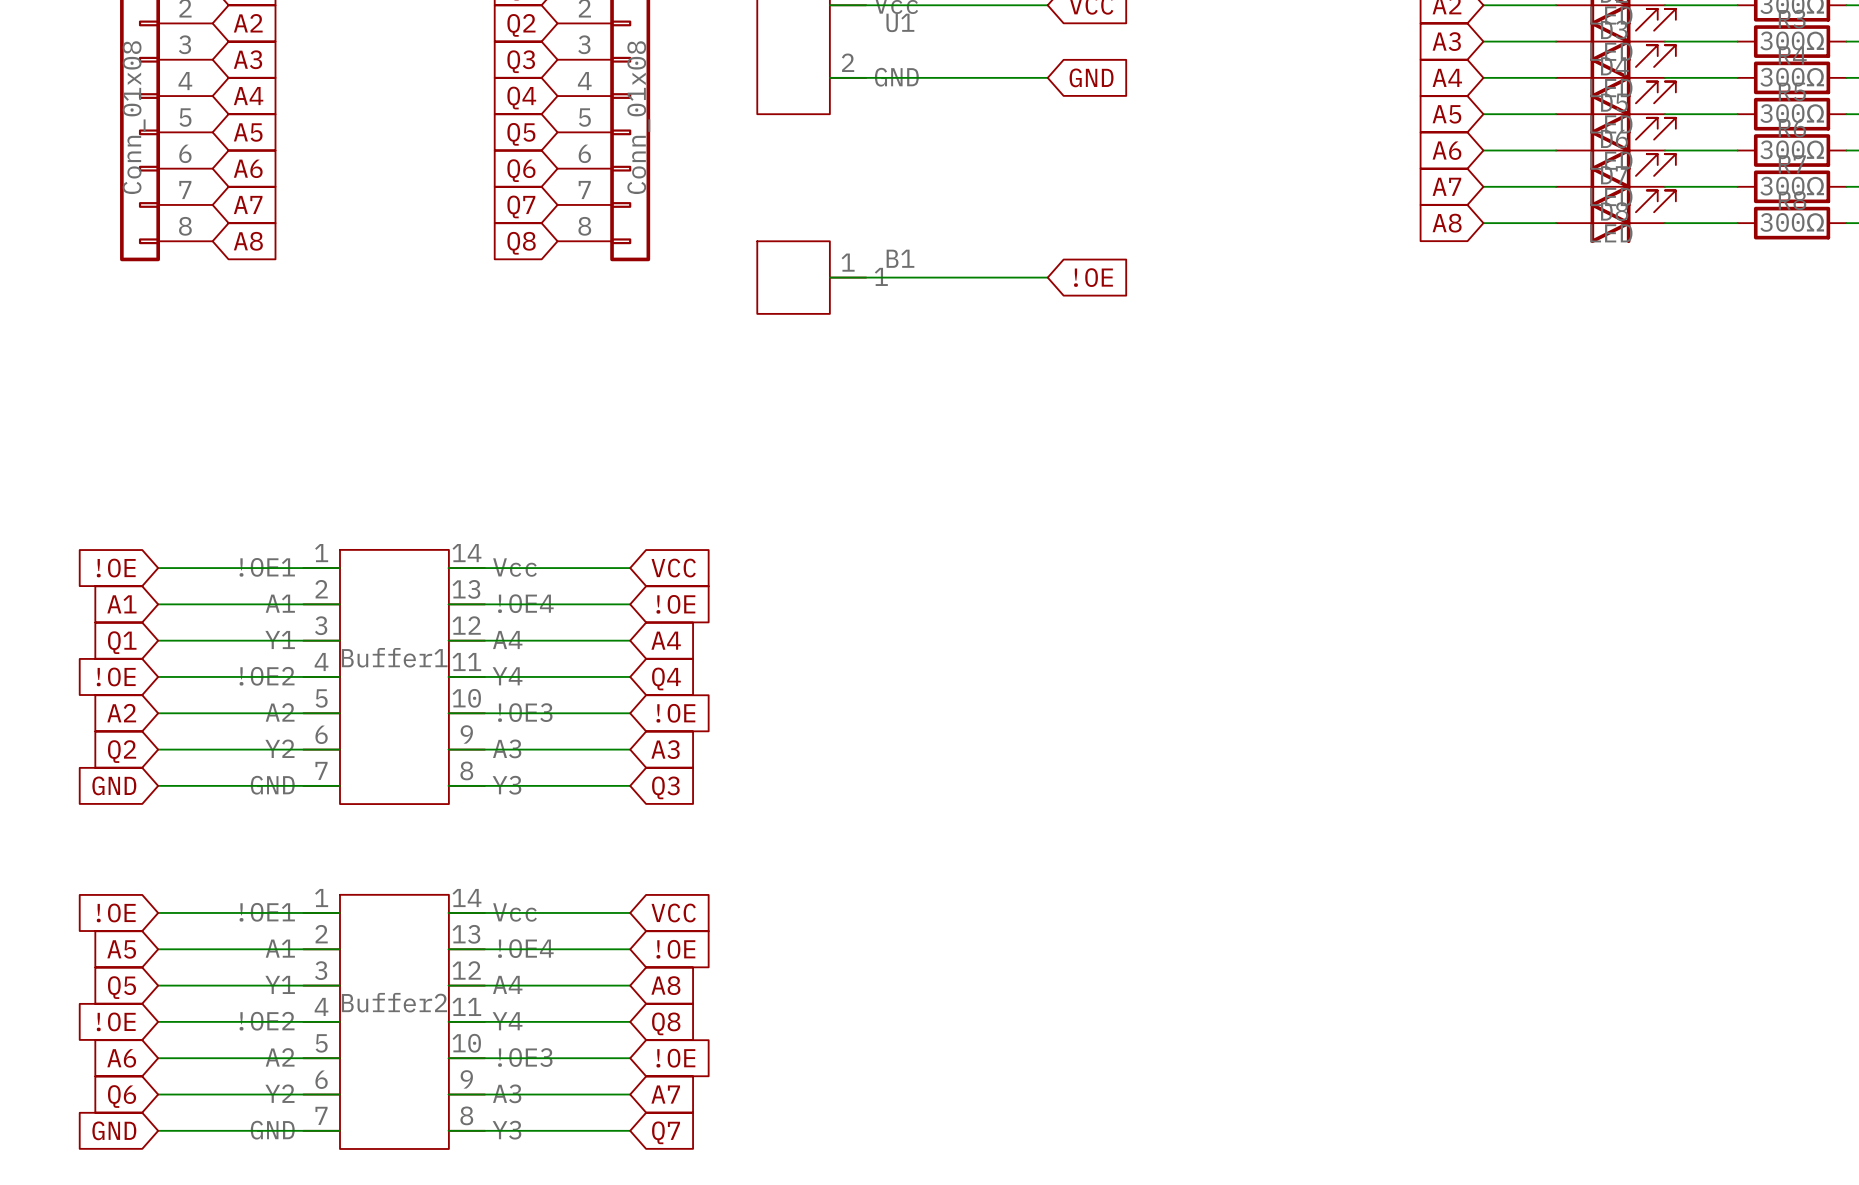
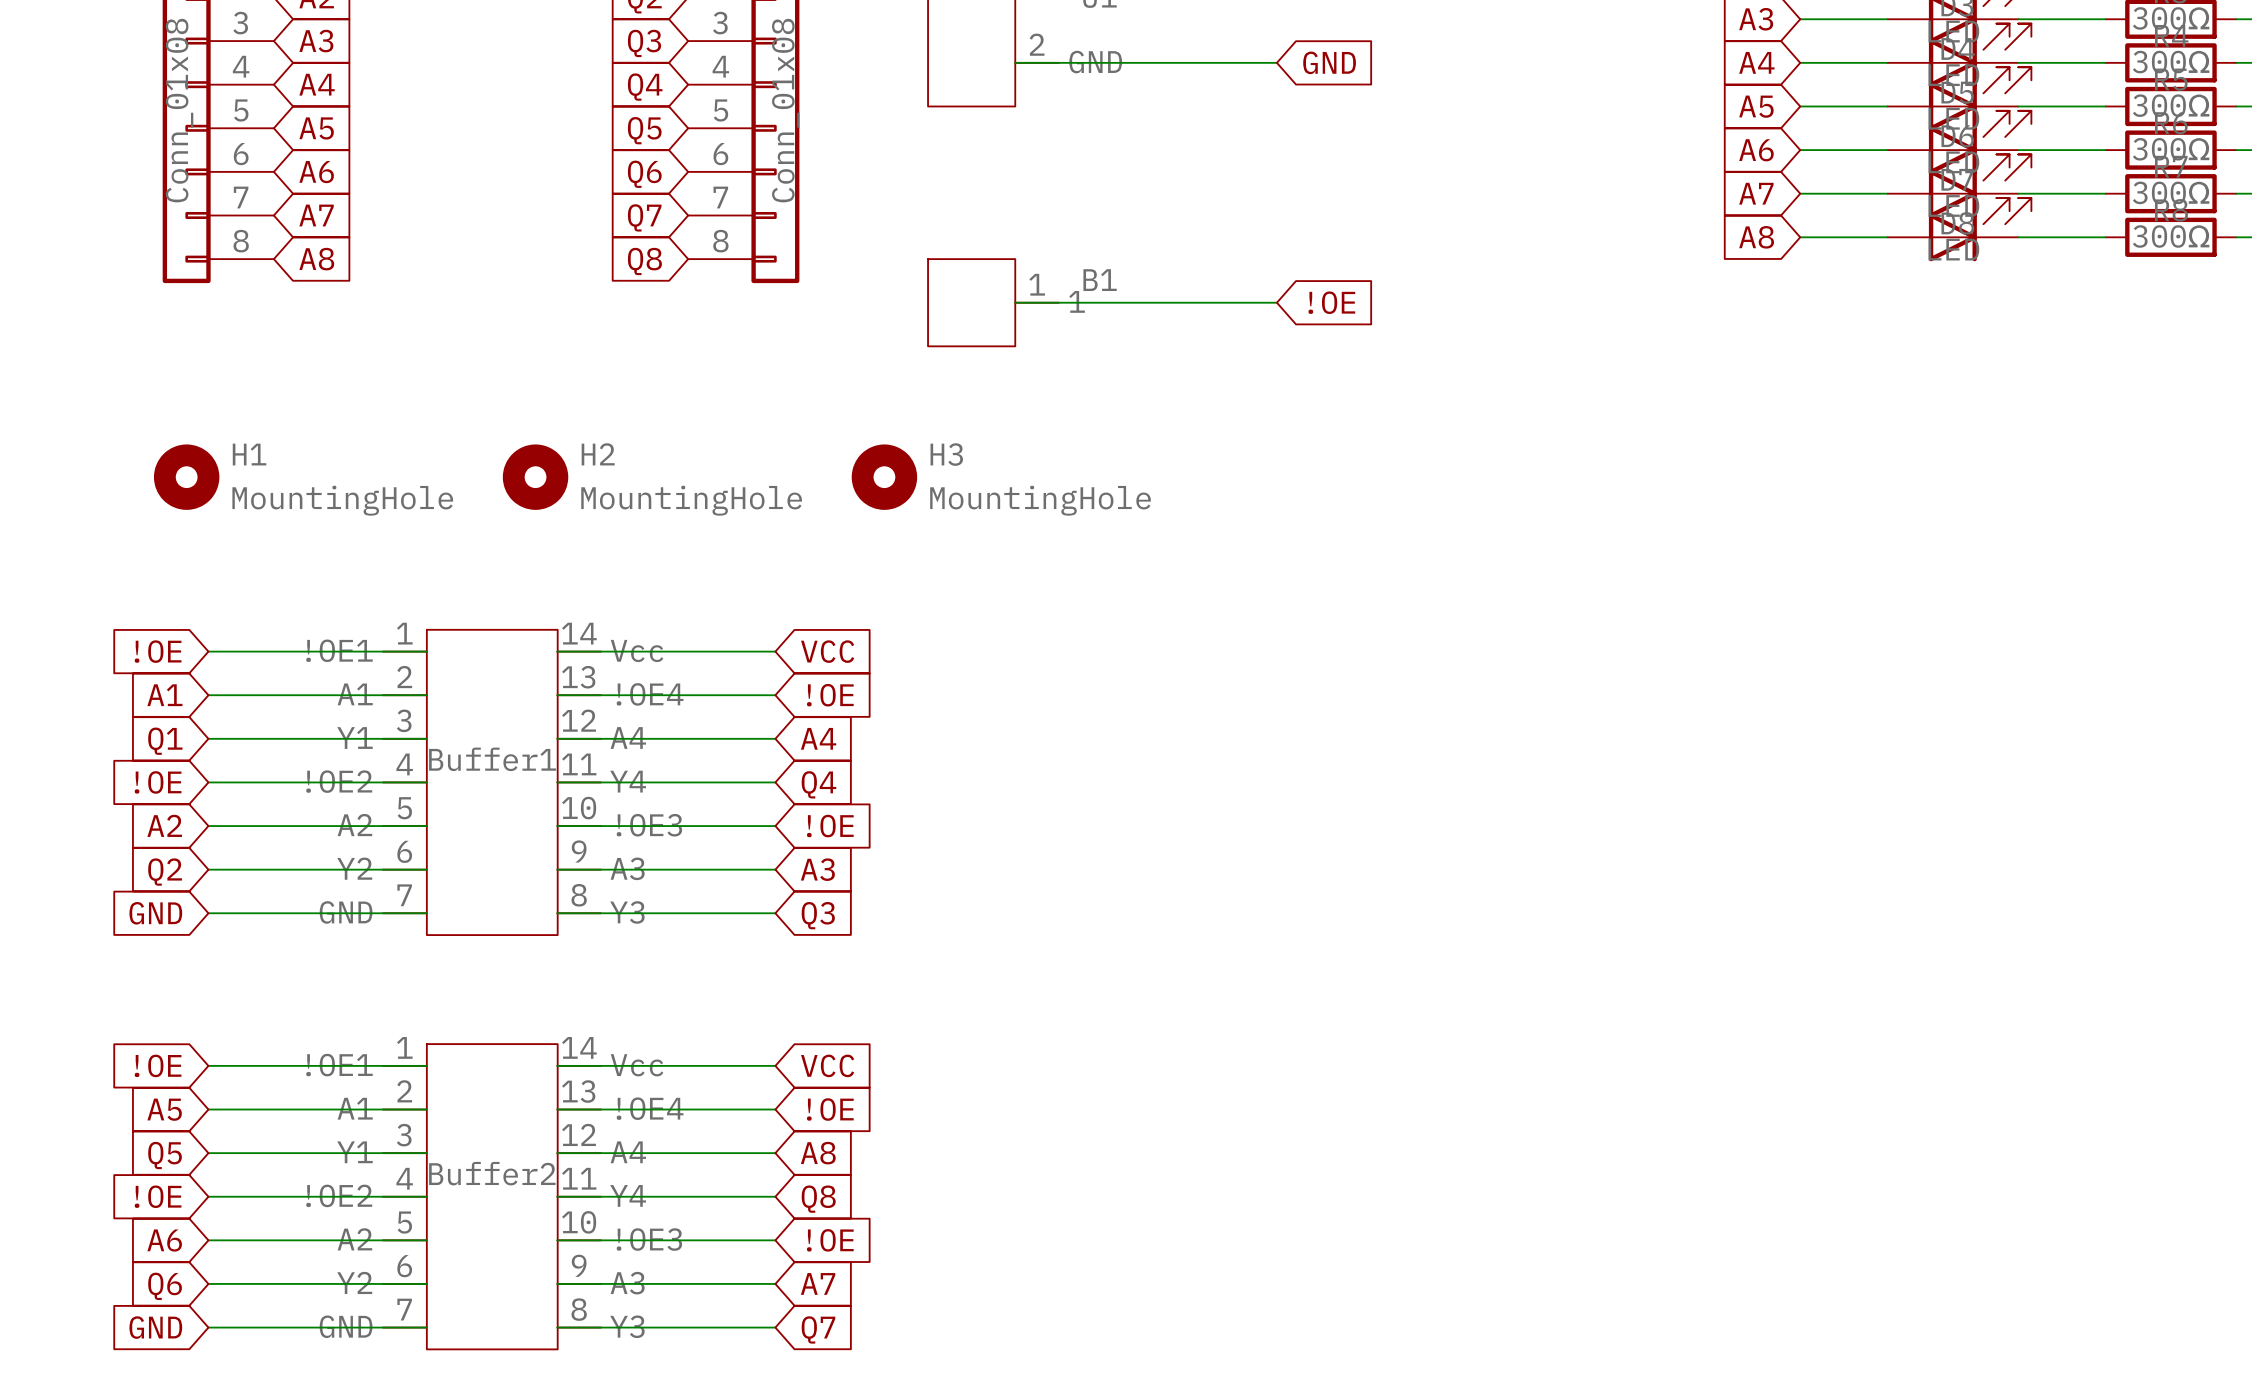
H1: none -> MountingHole (186, 477)
H2: none -> MountingHole (535, 477)
H3: none -> MountingHole (884, 477)

